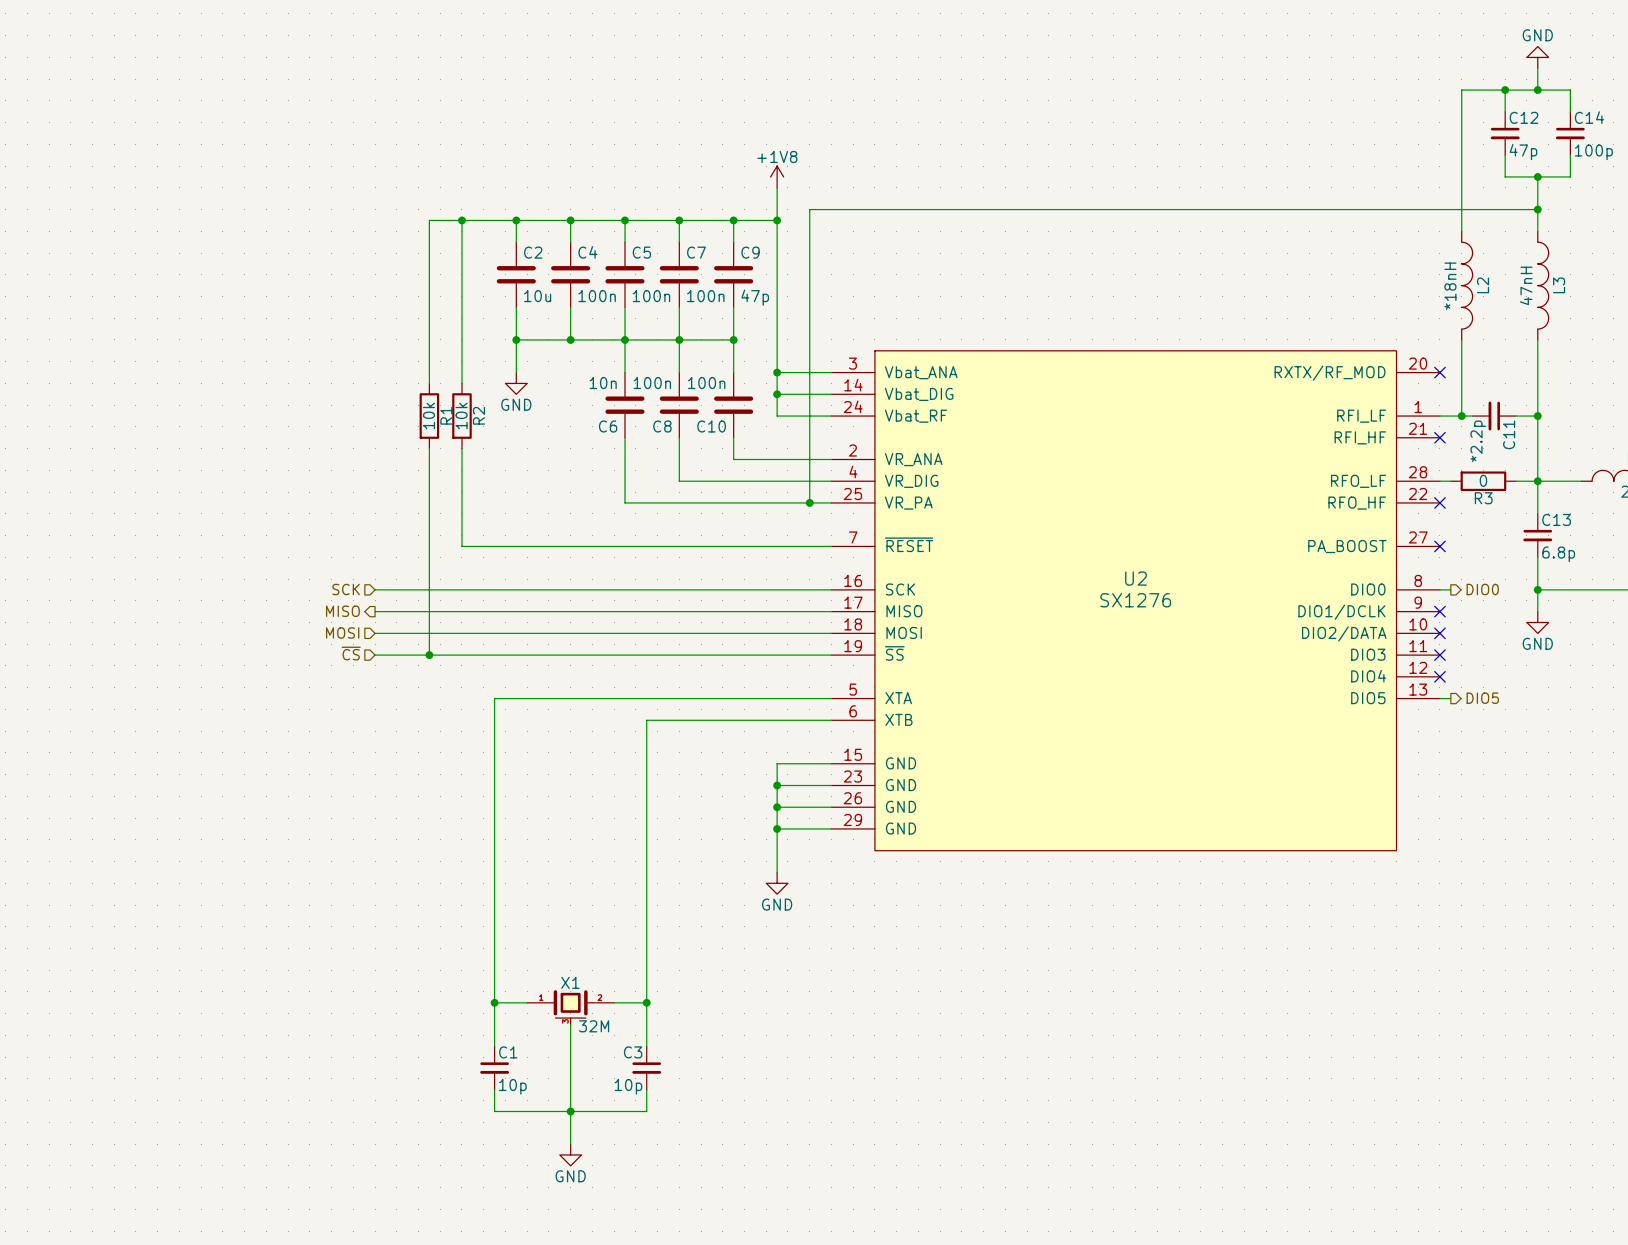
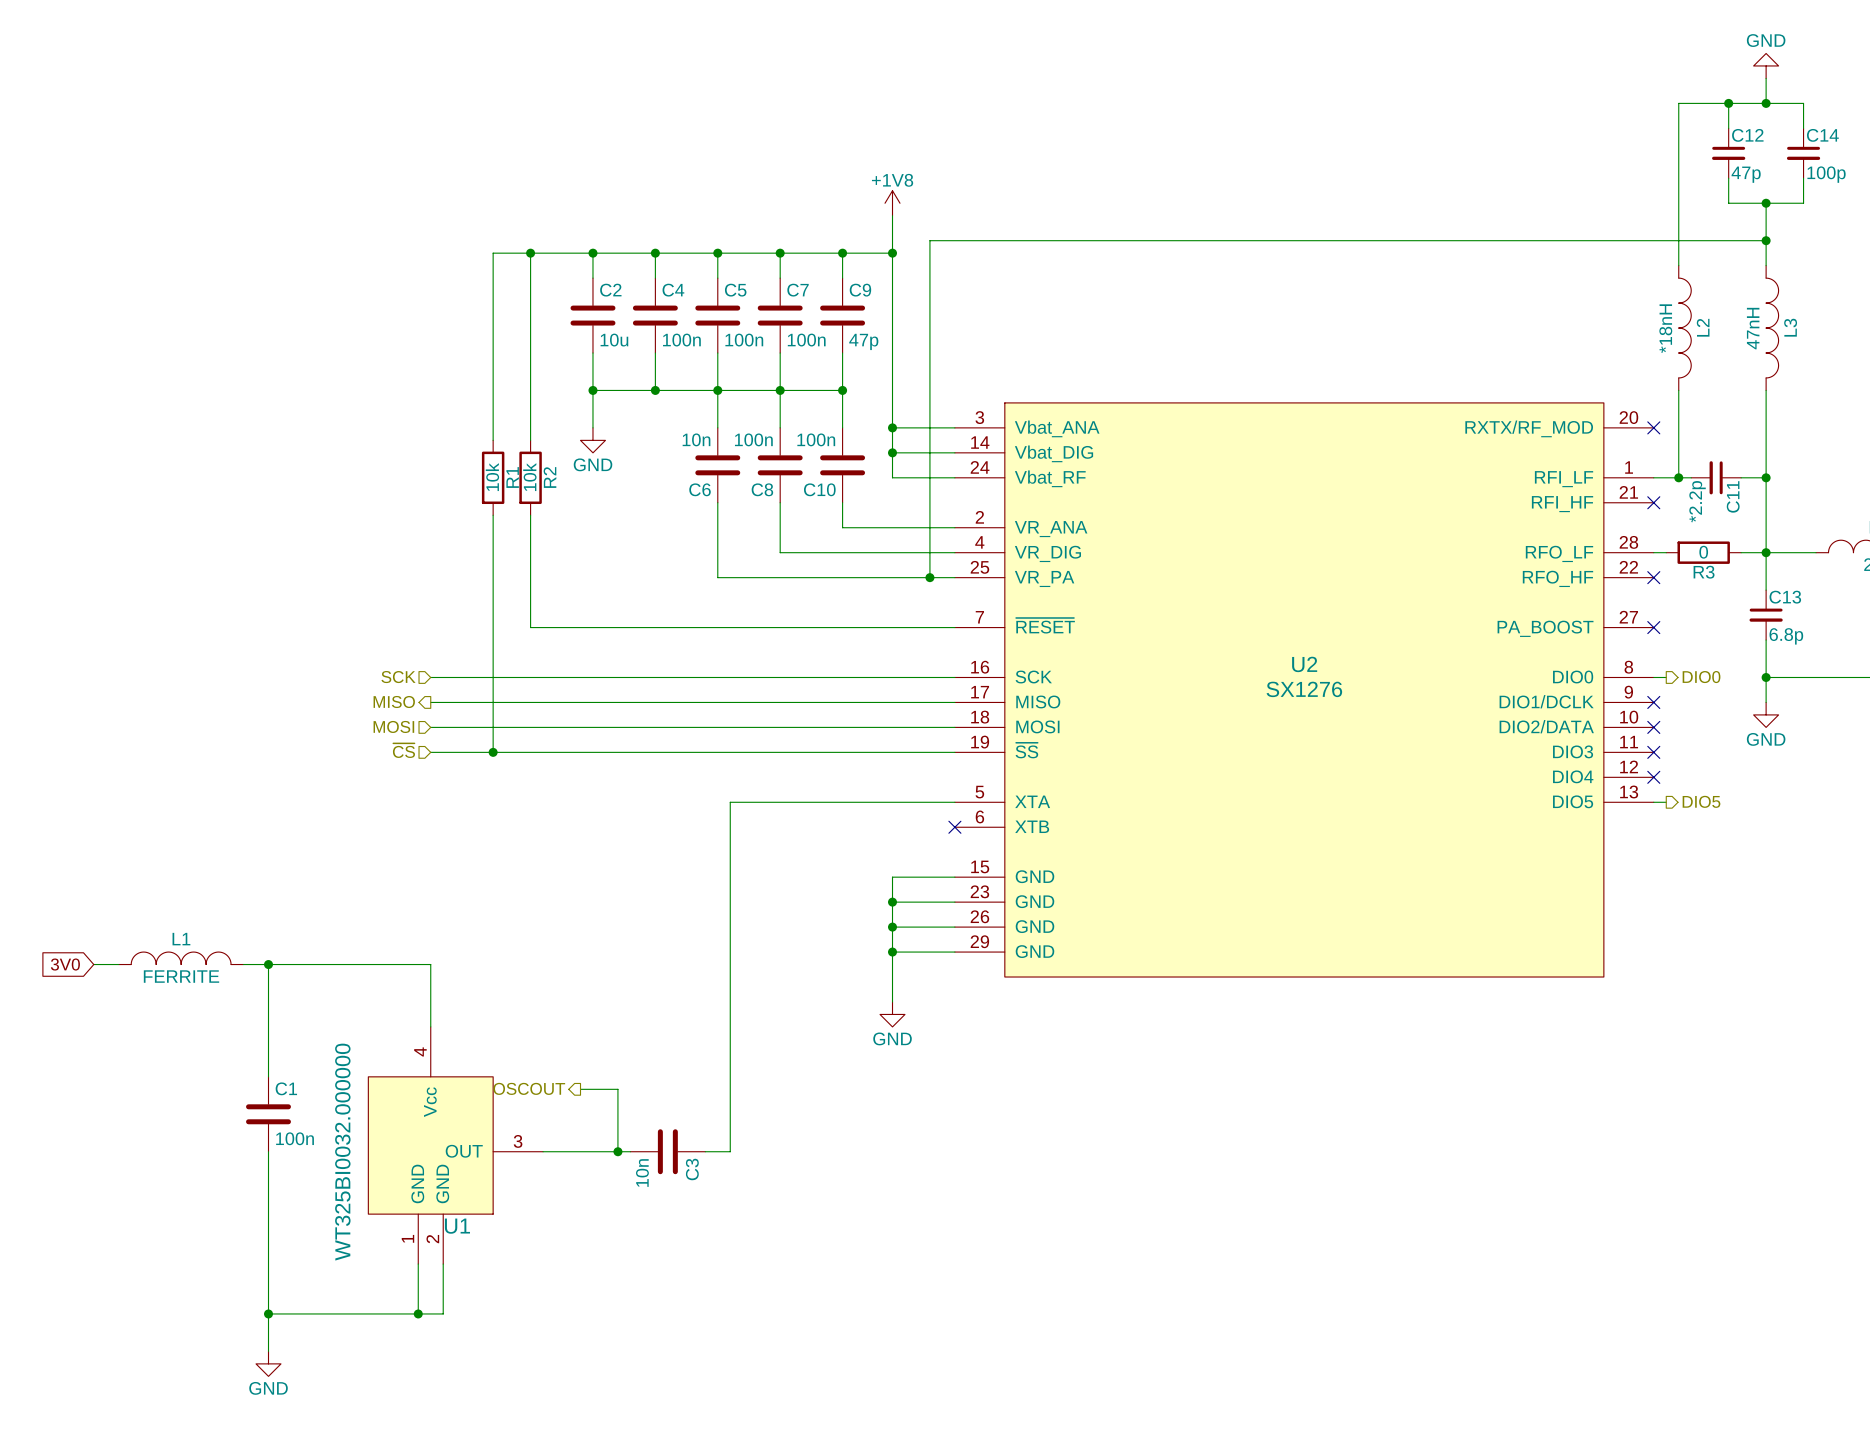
wire: (635, 698) (494, 698) (494, 1046) -> (730, 802) (730, 1151)
wire: (831, 720) (646, 720) (646, 1046) -> none
no-connect mark: none -> (954, 827)
L1: none -> FERRITE (181, 958)
global label: none -> 3V0 (65, 964)
wire: none -> (93, 964) (118, 964)
wire: none -> (243, 964) (430, 964) (430, 1026)
wire: none -> (268, 964) (268, 1076)
junction: none -> (268, 964)
hierarchical label: none -> OSCOUT (529, 1088)
wire: none -> (580, 1089) (617, 1089) (617, 1151)
U1: none -> WT325BI0032.000000 (455, 1145)
wire: none -> (268, 1151) (268, 1351)
wire: none -> (543, 1151) (568, 1151)
junction position: (494, 1002) -> (617, 1151)
wire: (635, 1002) (646, 1002) -> none
junction: (646, 1002) -> none
X1: 32M (570, 1007) -> none
wire: (570, 1024) (570, 1144) -> none
C1 symbol: [480, 1046, 510, 1090] -> [246, 1076, 291, 1152]
C3 symbol: [632, 1046, 662, 1090] -> [630, 1129, 706, 1175]
C3 name position: C3 (633, 1052) -> C3 (692, 1169)
C1 value: 10p (512, 1086) -> 100n (295, 1138)
C3 value: 10p (628, 1086) -> 10n (642, 1173)
wire: (494, 1089) (494, 1111) (646, 1111) (646, 1089) -> none
wire: none -> (418, 1264) (418, 1313)
wire: none -> (443, 1264) (443, 1313) (268, 1313)
junction: (570, 1111) -> none
junction: none -> (268, 1313)
junction: none -> (418, 1313)
power symbol: GND (570, 1154) -> none
power symbol: none -> GND (268, 1363)

